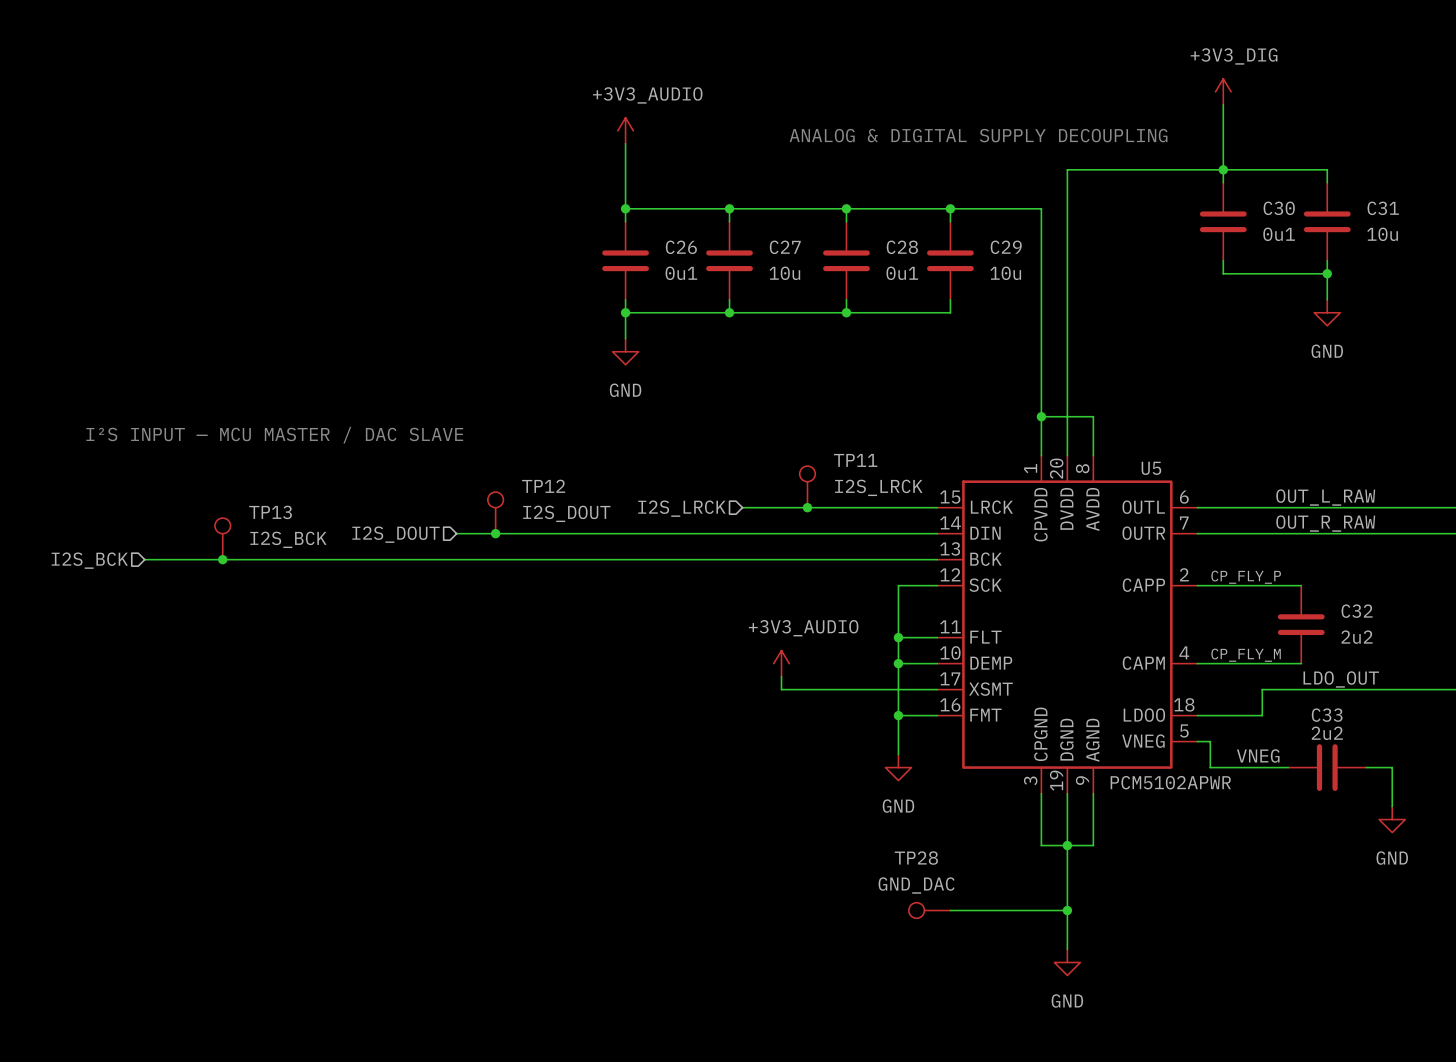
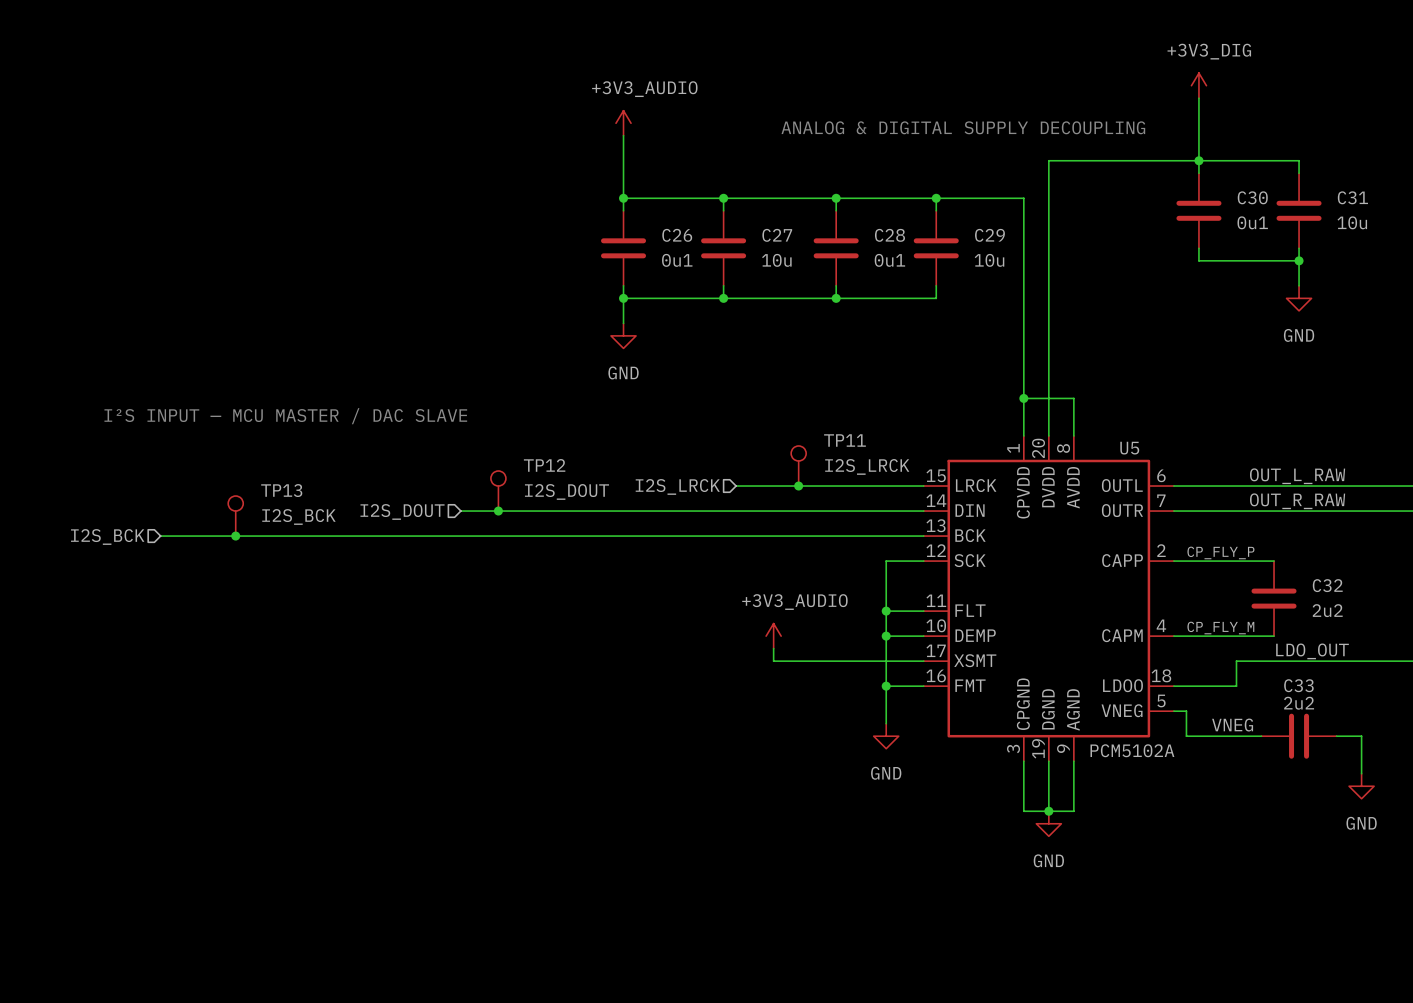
U5 value: PCM5102APWR (1170, 782) -> PCM5102A (1132, 750)
wire: (1067, 845) (1067, 949) -> none
TP28: GND_DAC (929, 910) -> none
wire: (950, 910) (1067, 910) -> none
junction: (1067, 910) -> none
power symbol position: GND (1067, 962) -> GND (1048, 823)

